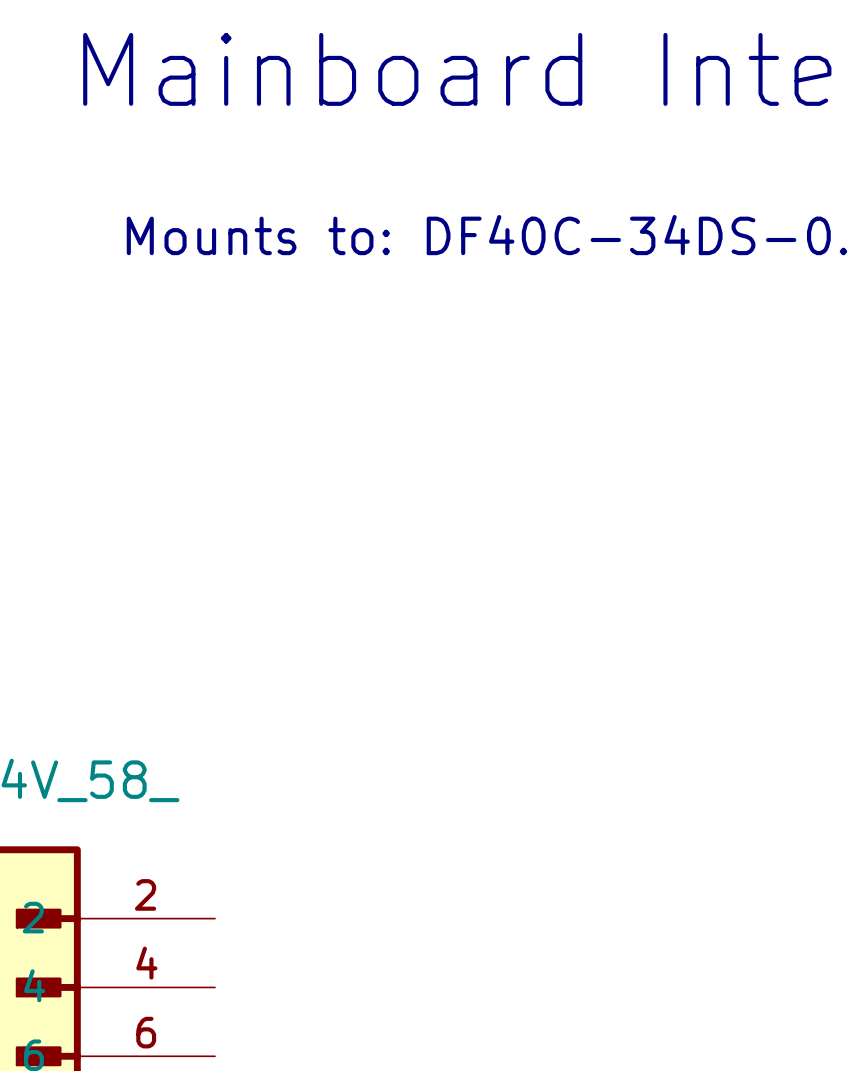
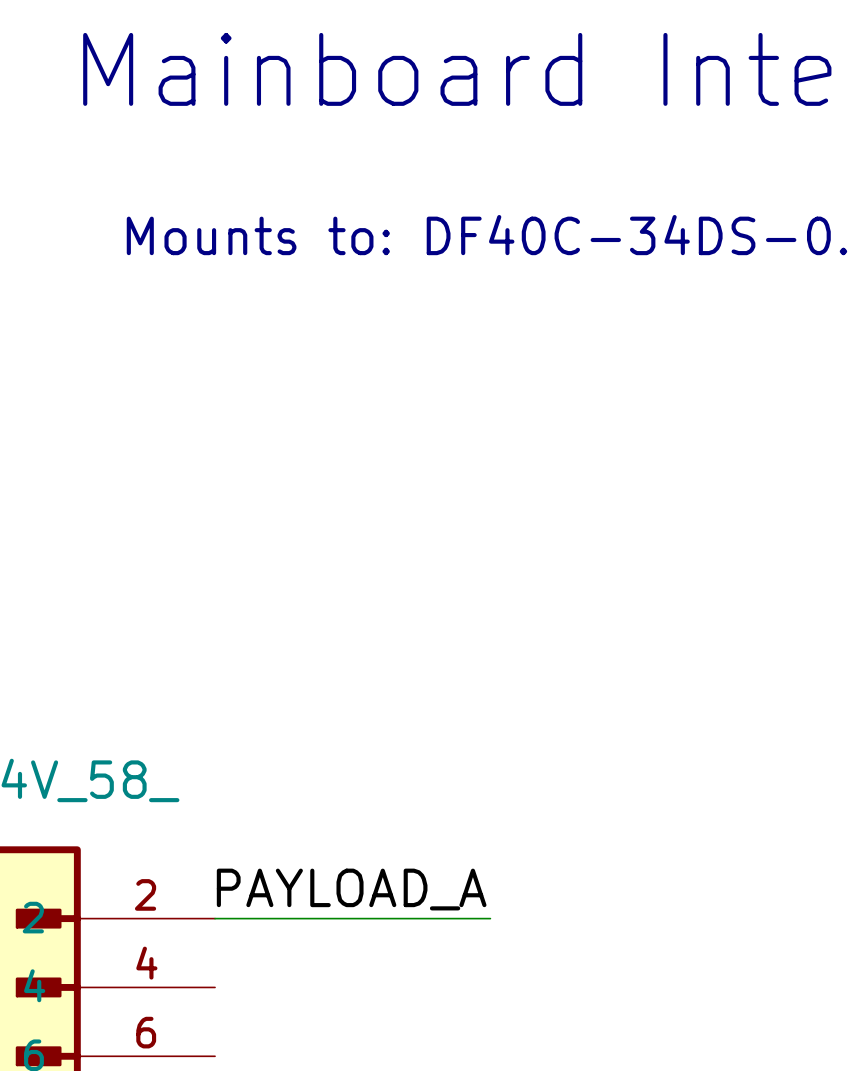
label: none -> PAYLOAD_A (351, 889)
wire: none -> (215, 918) (490, 918)

